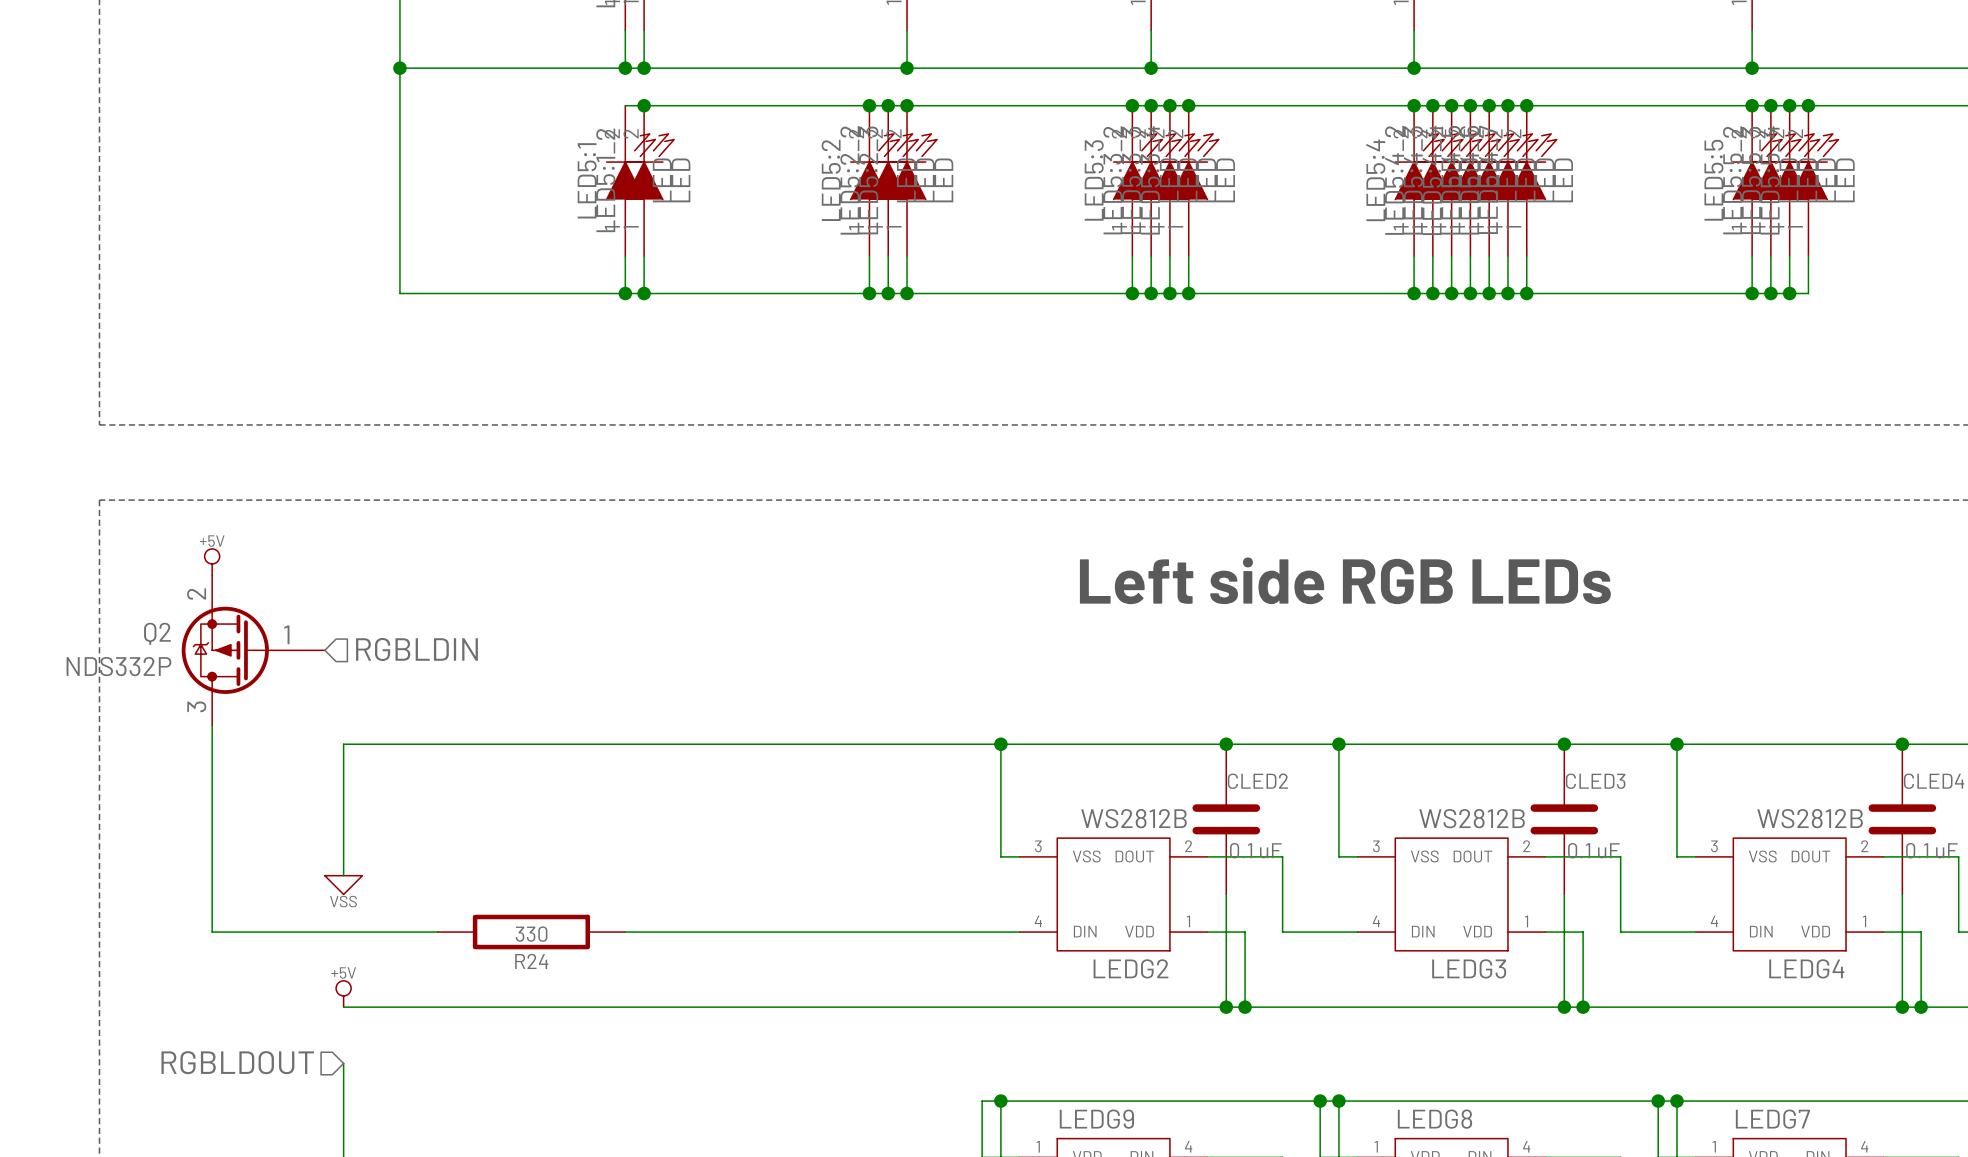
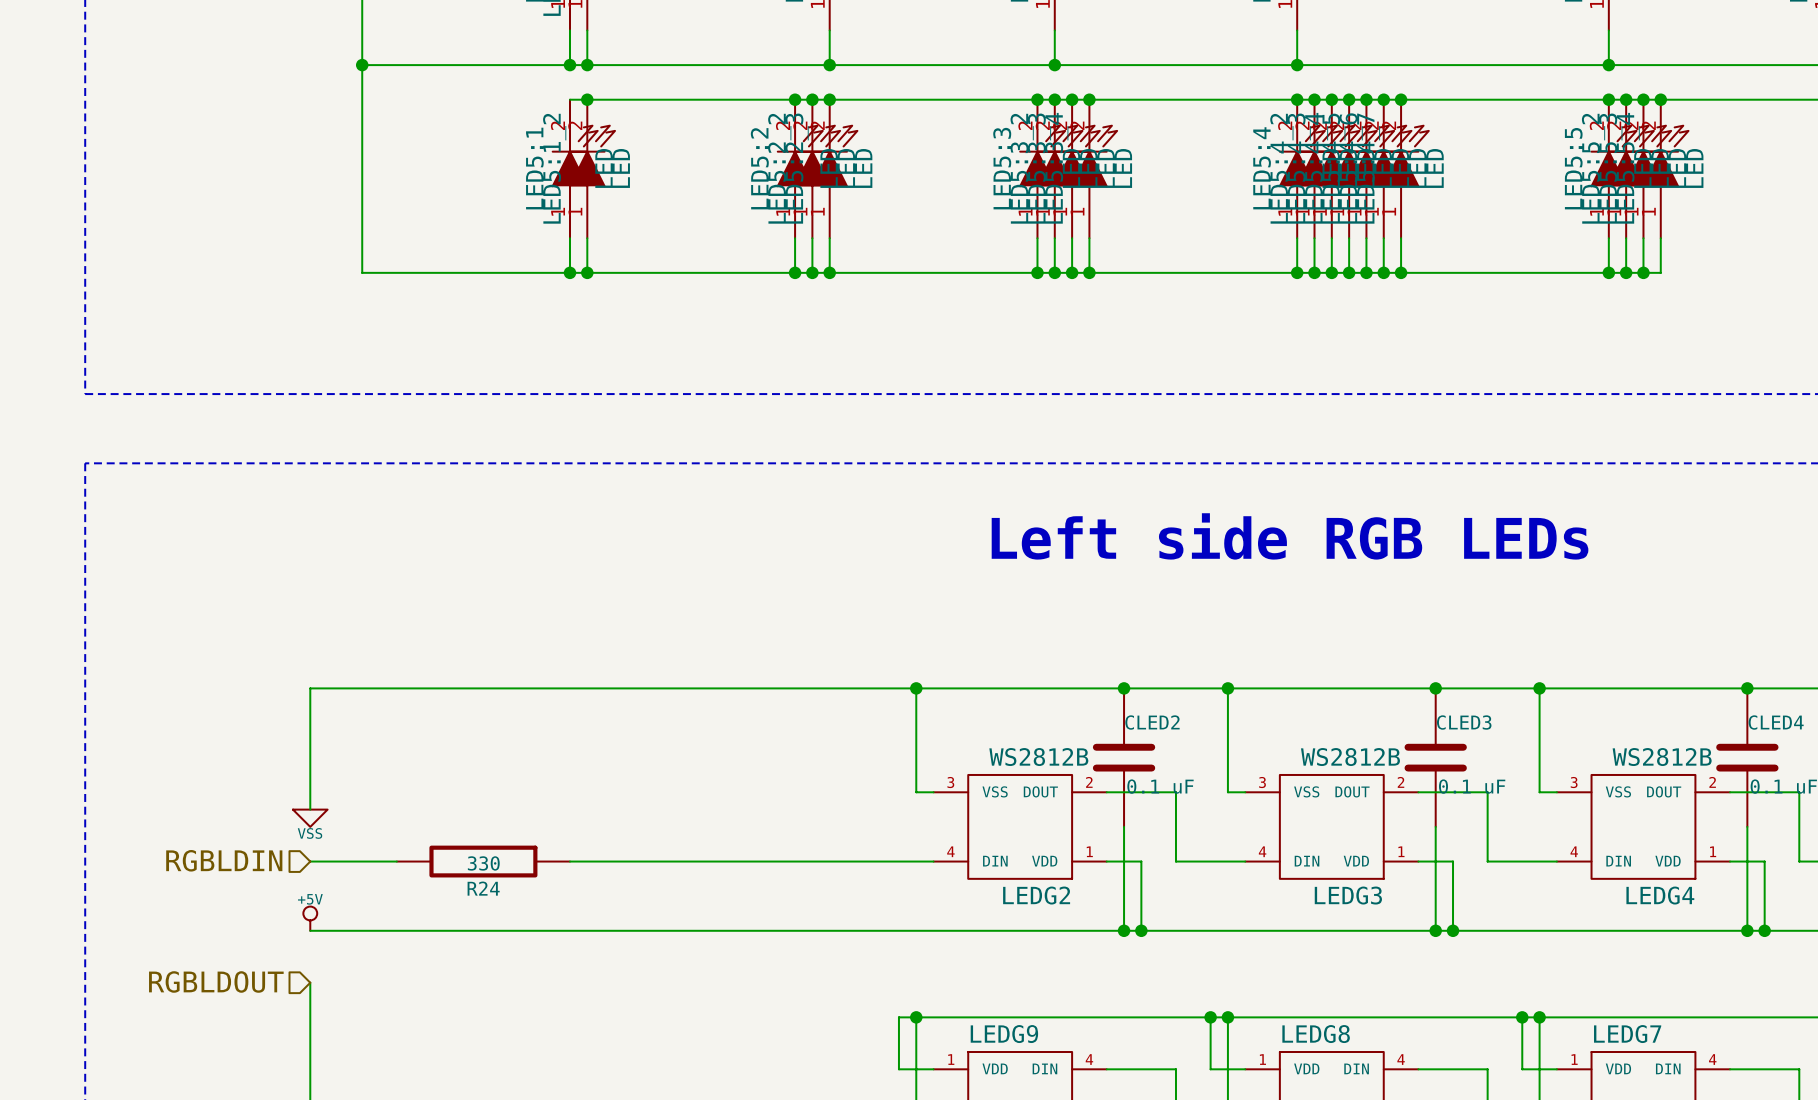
power symbol: +5V (212, 562) -> none
hierarchical label rotation: 0° (416, 649) -> 180° (224, 860)
hierarchical label position: RGBLDIN (416, 649) -> RGBLDIN (224, 860)
Q2: NDS332P (253, 650) -> none
wire: (212, 725) (212, 932) (343, 932) -> none

